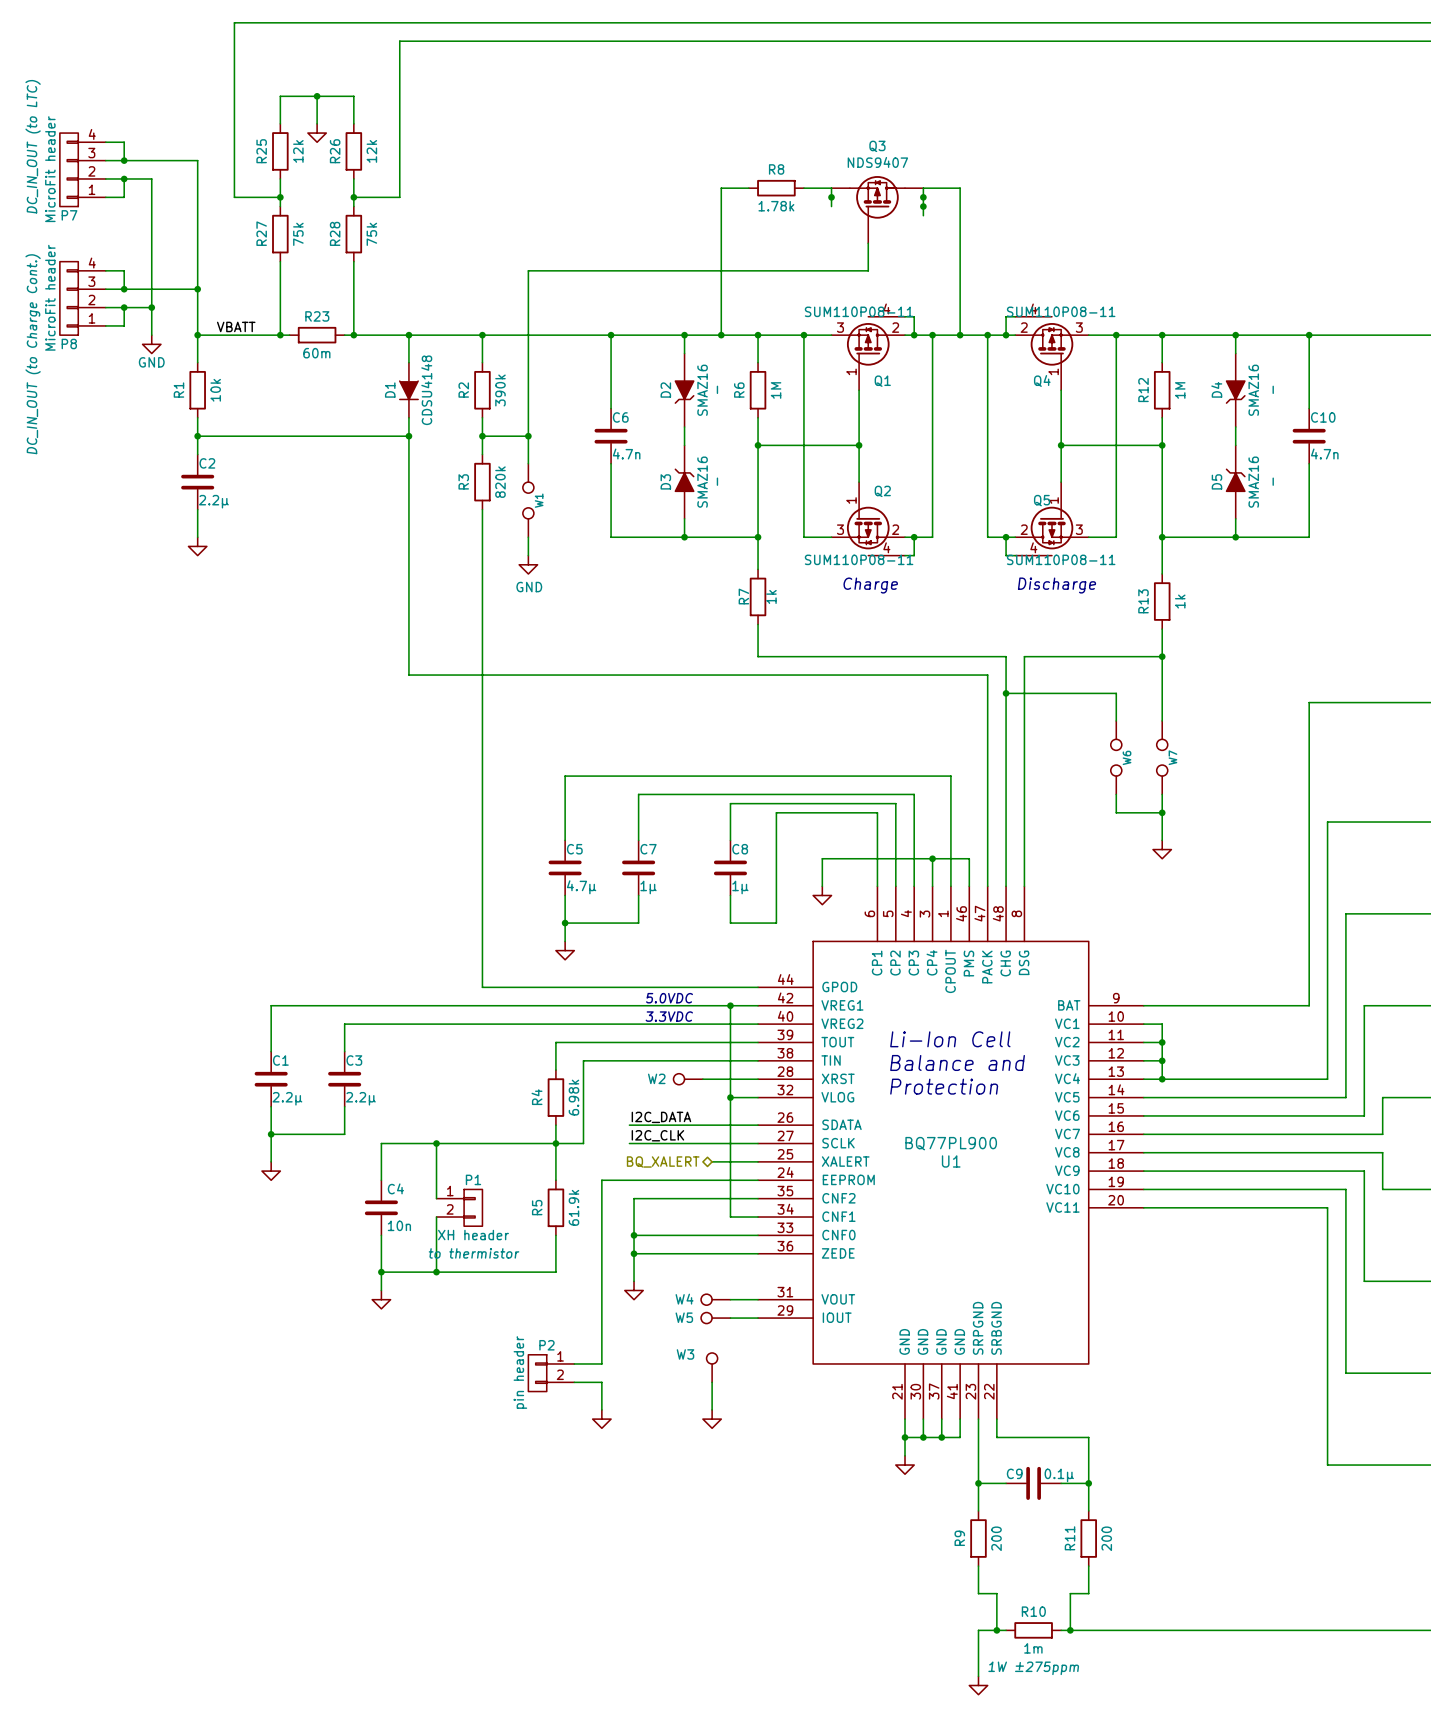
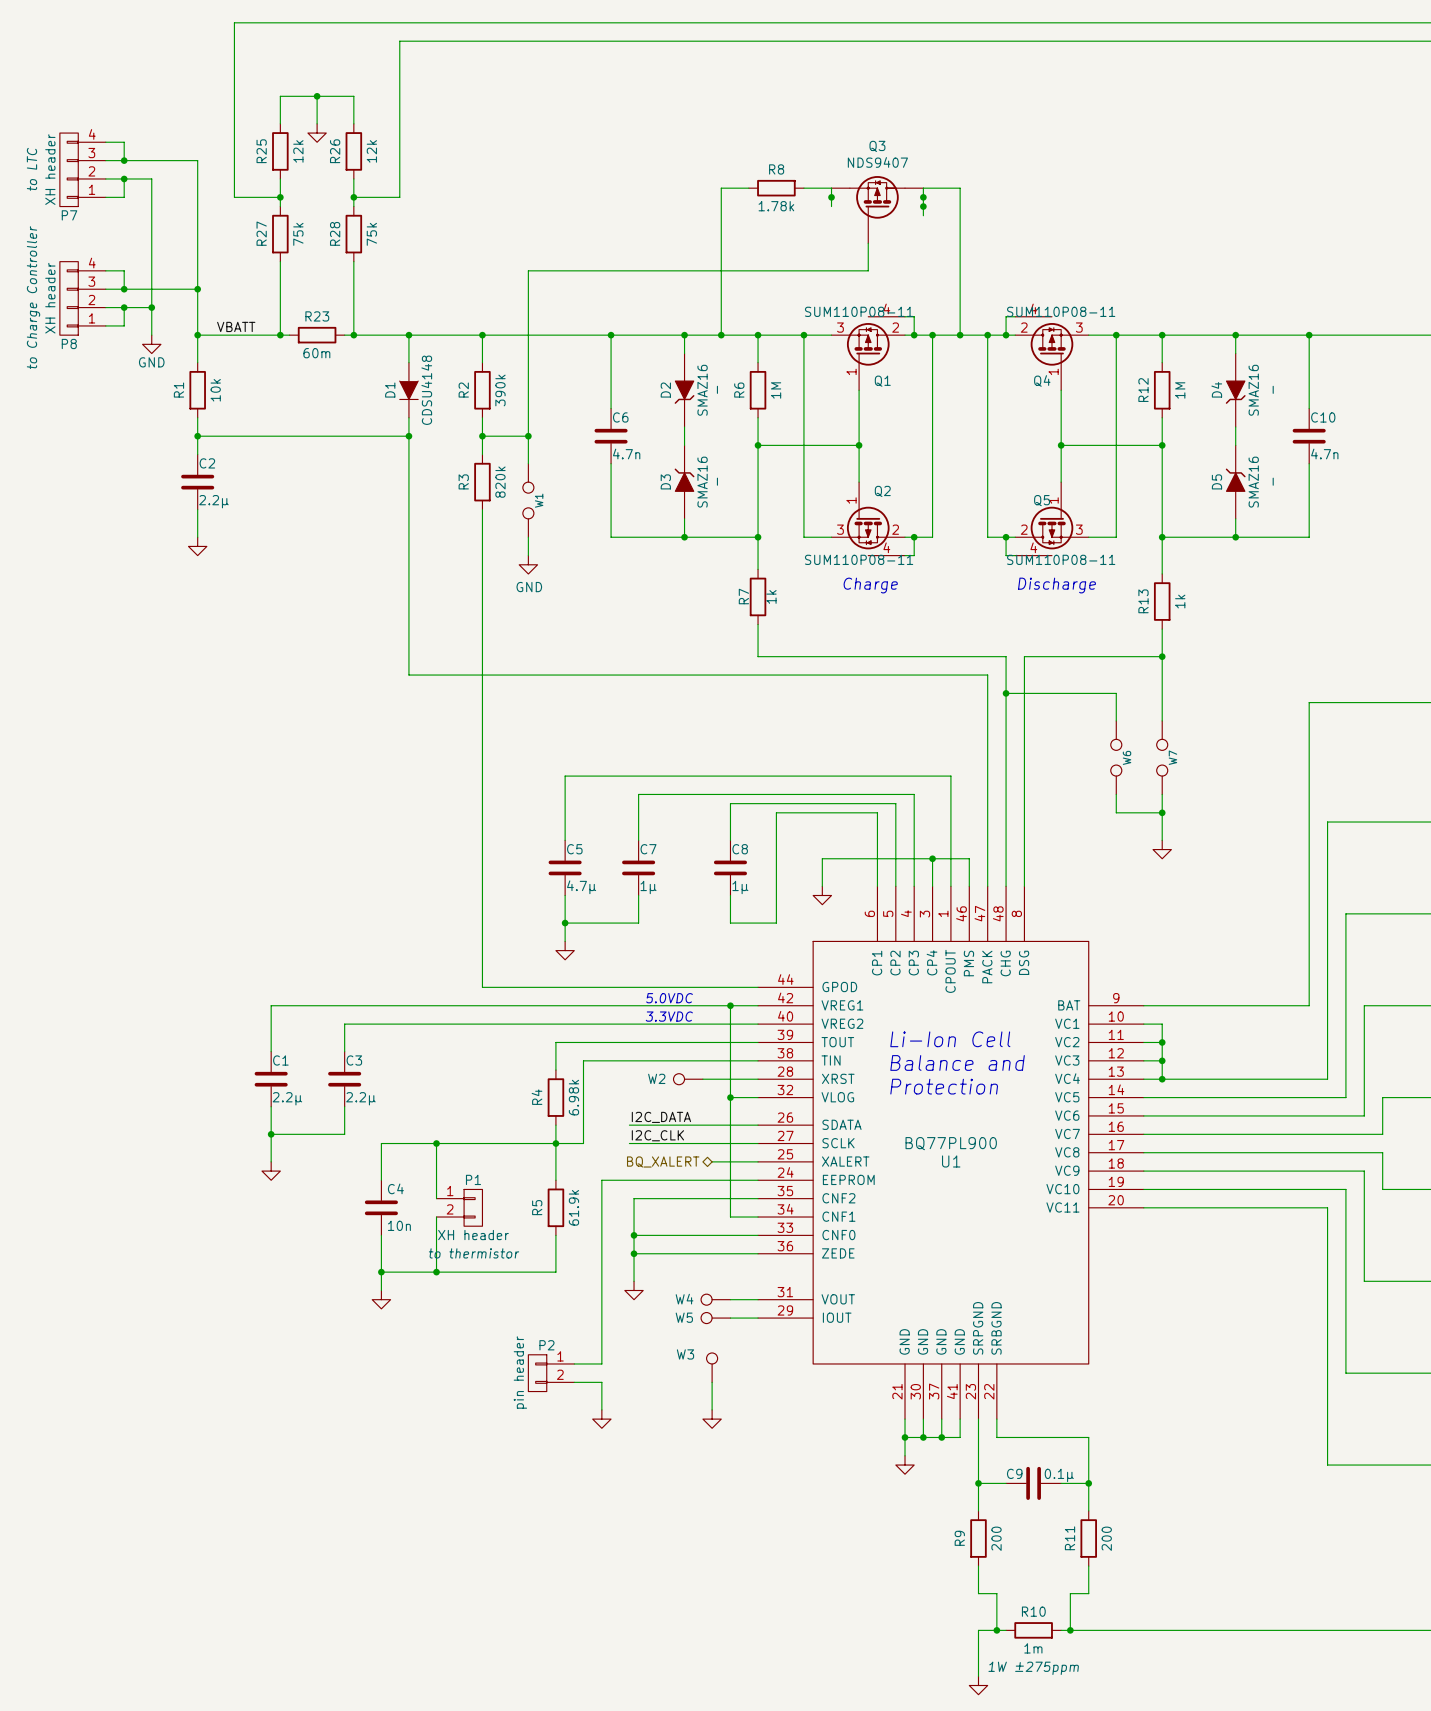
P7 text: DC_IN_OUT (to LTC) (33, 146) -> to LTC (31, 169)
P7 value: MicroFit header (50, 169) -> XH header (50, 169)
P8 value: MicroFit header (50, 297) -> XH header (50, 298)
P8 text: DC_IN_OUT (to Charge Cont.) (33, 354) -> to Charge Controller (33, 297)

